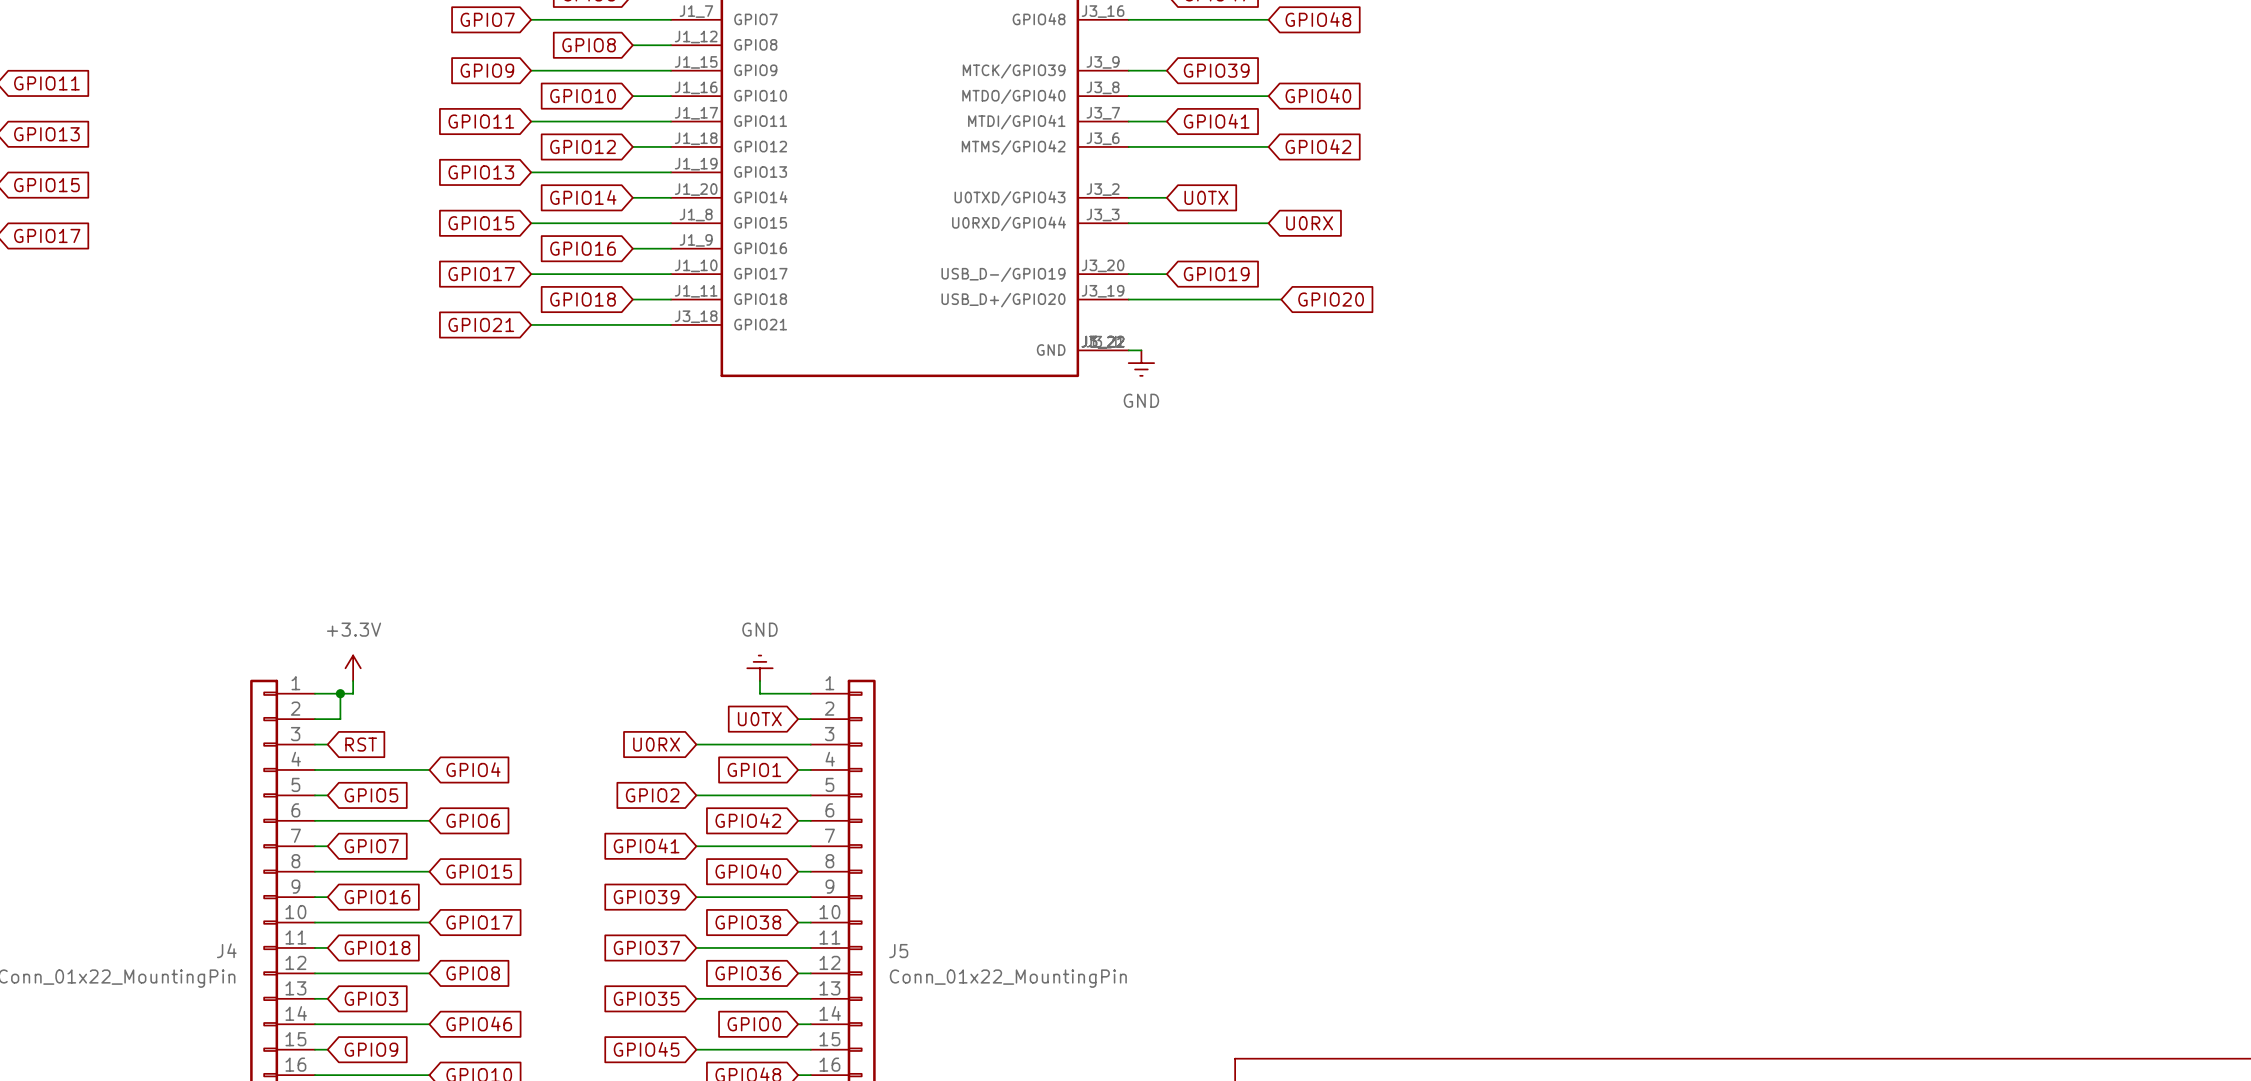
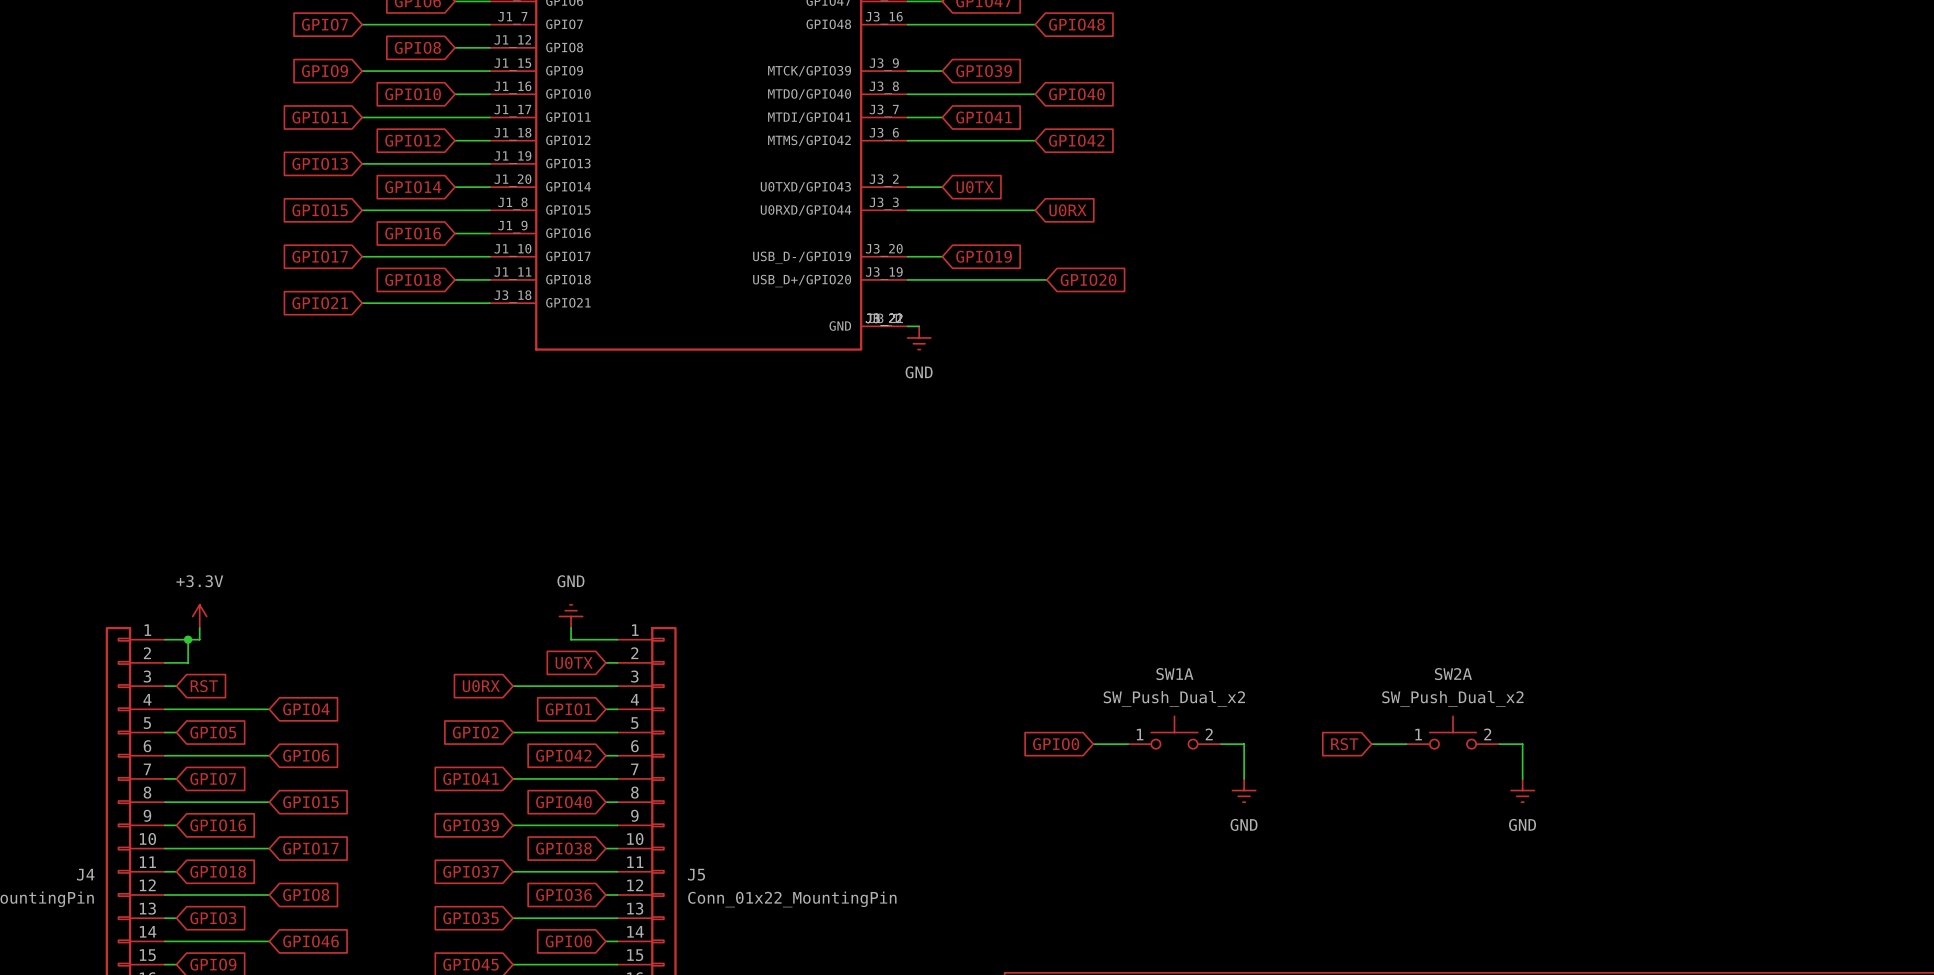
SW1A: none -> SW_Push_Dual_x2 (1174, 732)
SW2A: none -> SW_Push_Dual_x2 (1453, 732)
global label: none -> GPIO0 (1056, 744)
wire: none -> (1093, 744) (1128, 744)
wire: none -> (1220, 744) (1244, 744) (1244, 778)
global label: none -> RST (1344, 744)
wire: none -> (1371, 744) (1406, 744)
wire: none -> (1499, 744) (1522, 744) (1522, 778)
power symbol: none -> GND (1244, 790)
power symbol: none -> GND (1522, 790)

